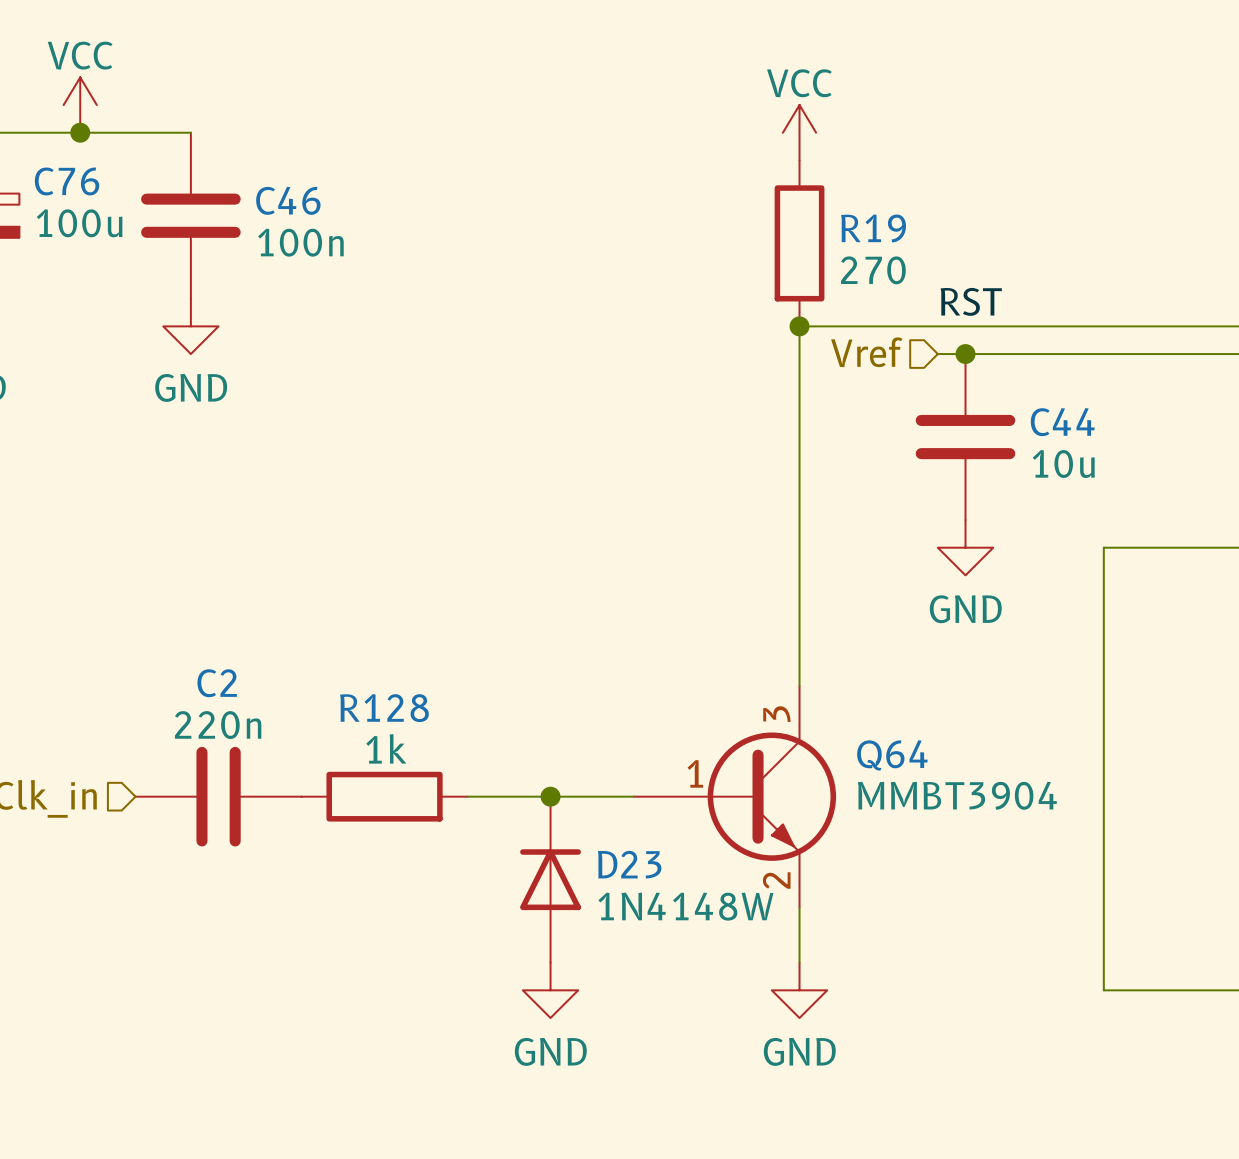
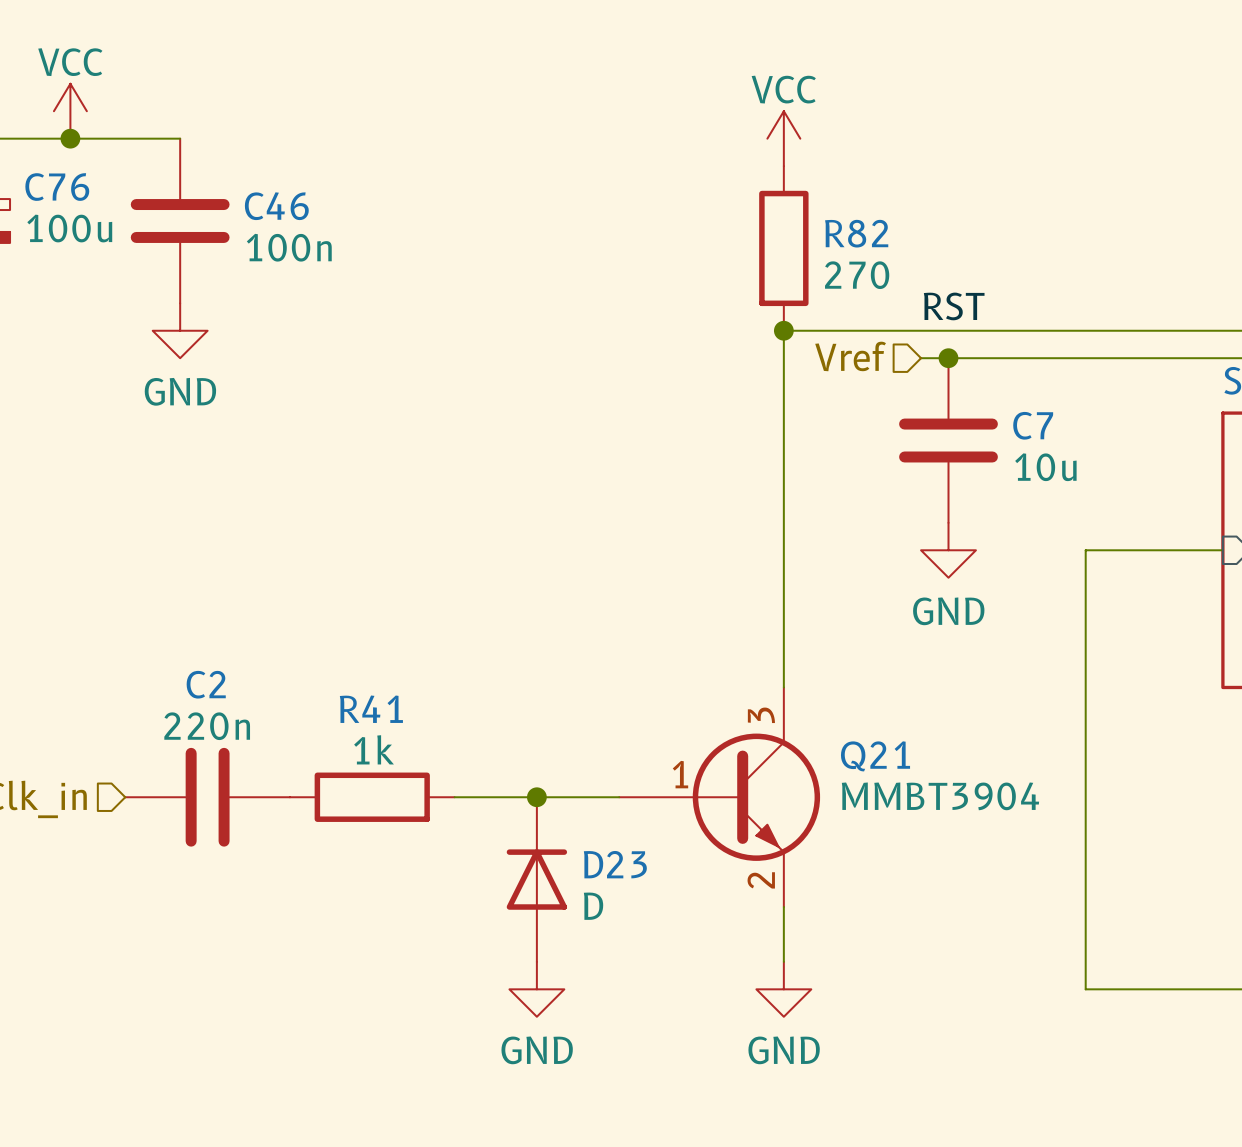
R19 name: R19 (873, 228) -> R82 (856, 233)
C44 name: C44 (1062, 422) -> C7 (1033, 425)
R128 name: R128 (384, 708) -> R41 (371, 709)
Q64 name: Q64 (892, 755) -> Q21 (875, 756)
D23 value: 1N4148W (685, 906) -> D (593, 906)

